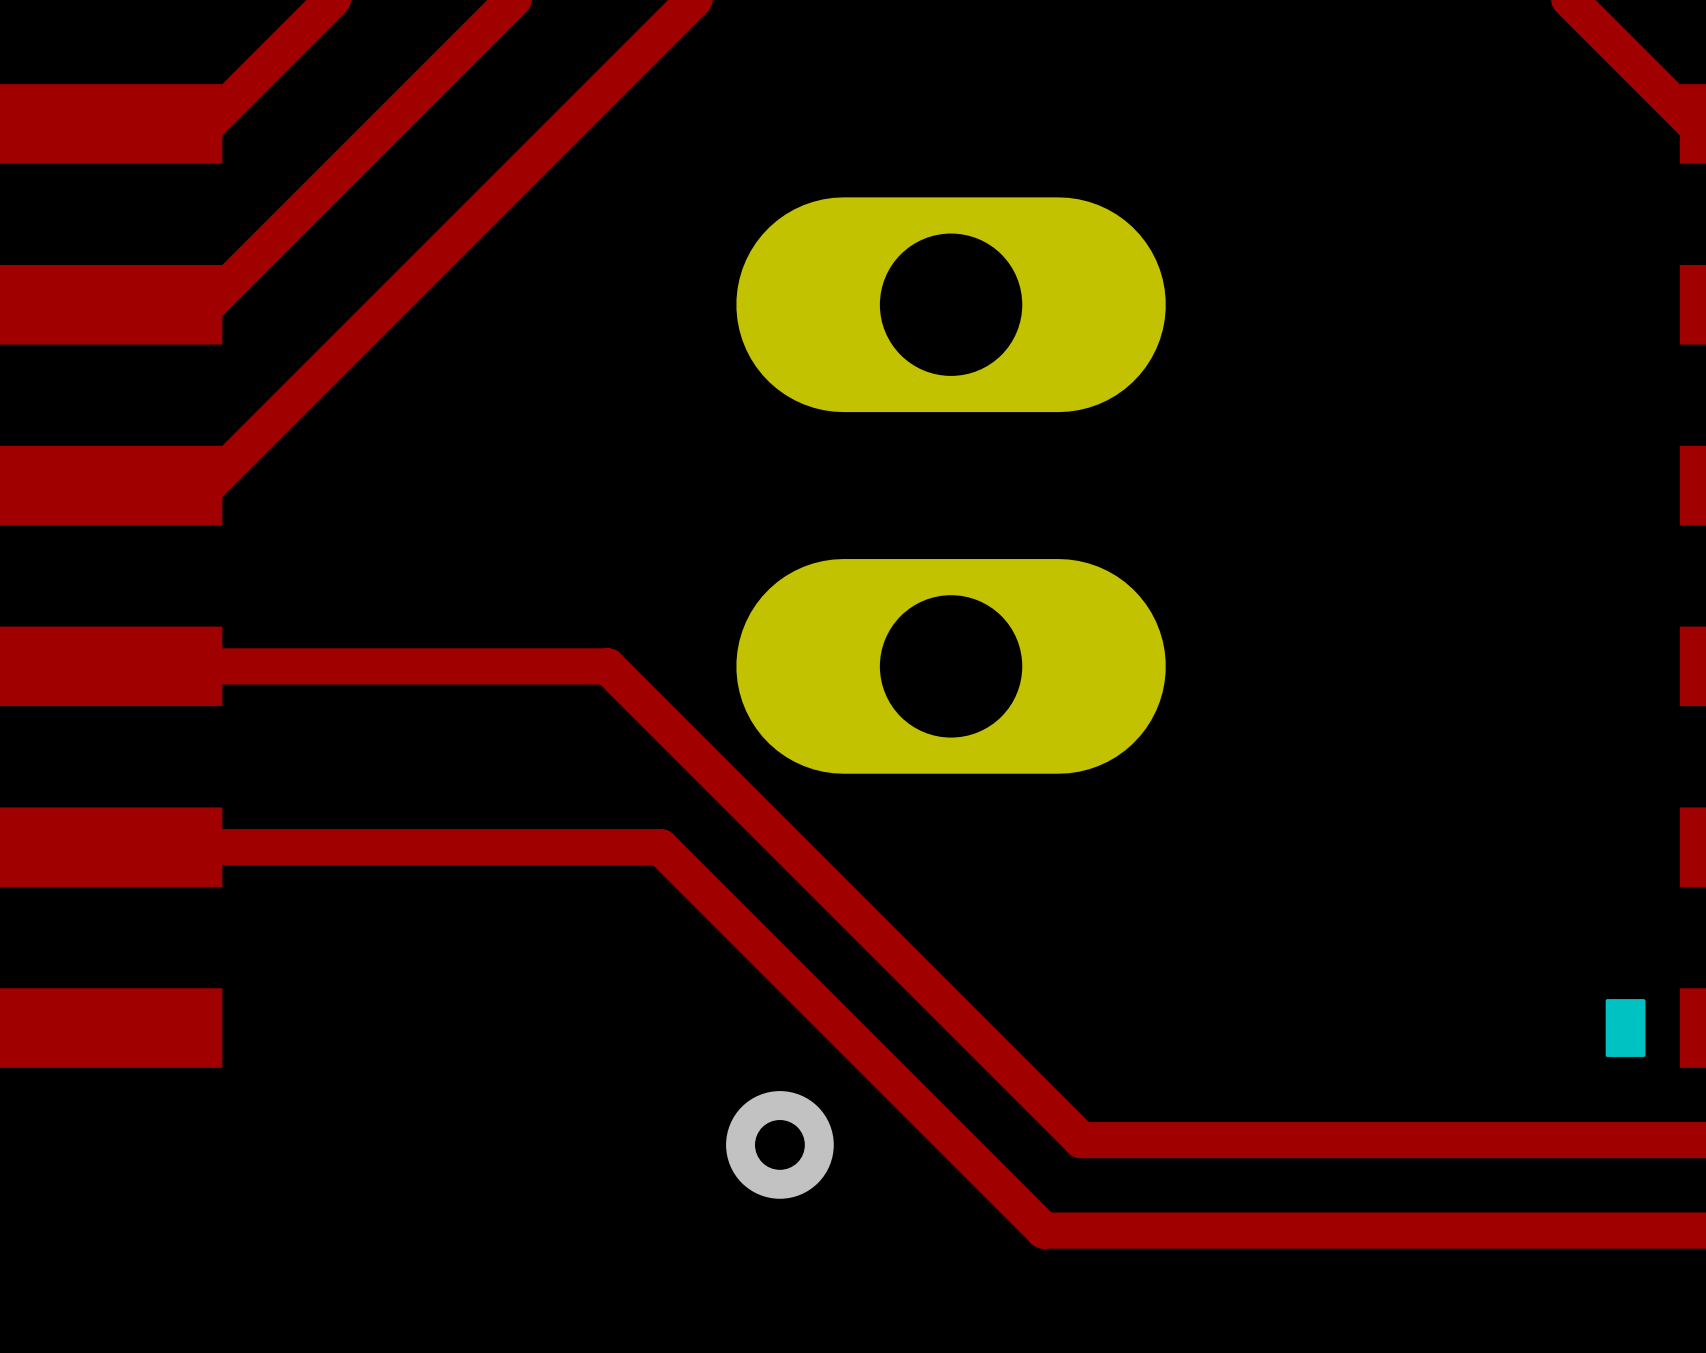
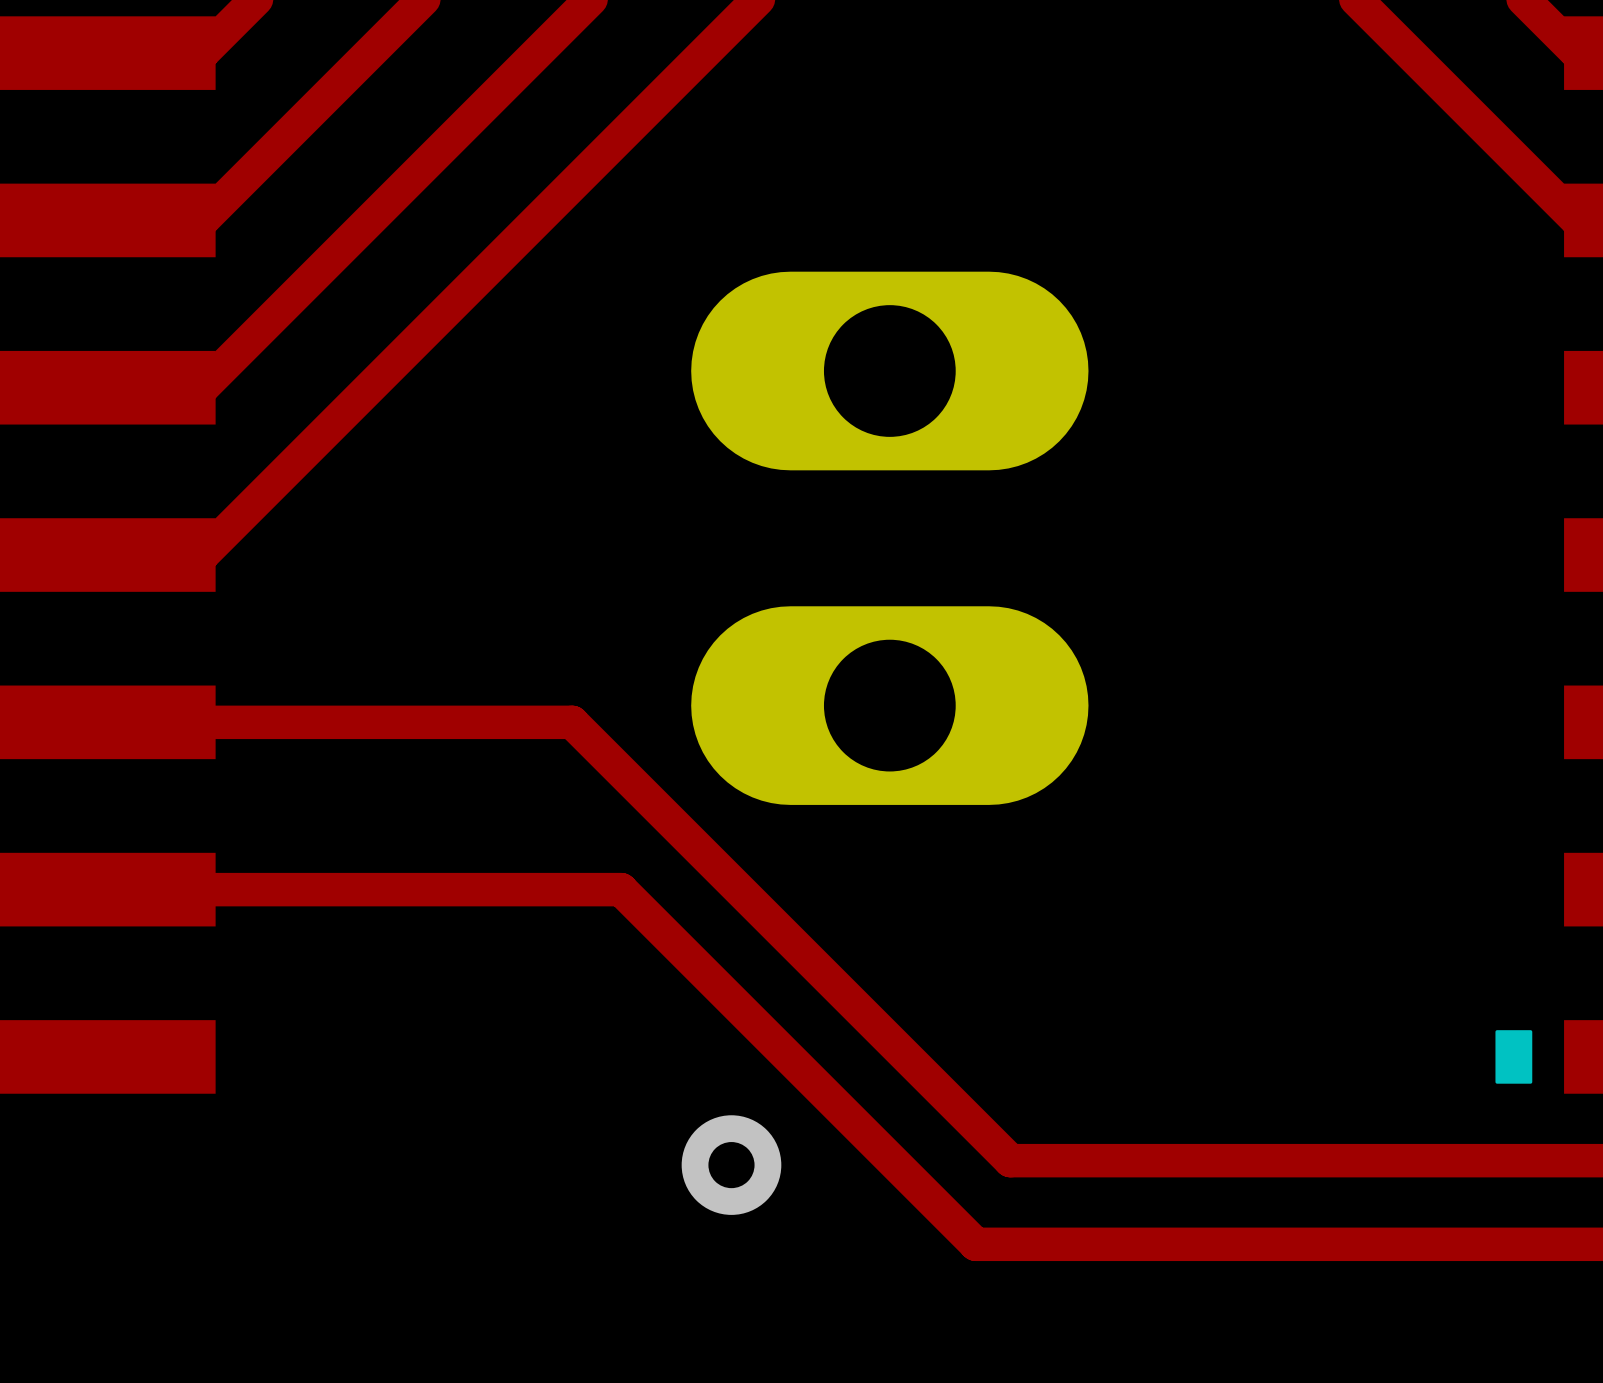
part position: (951, 485) -> (889, 538)

